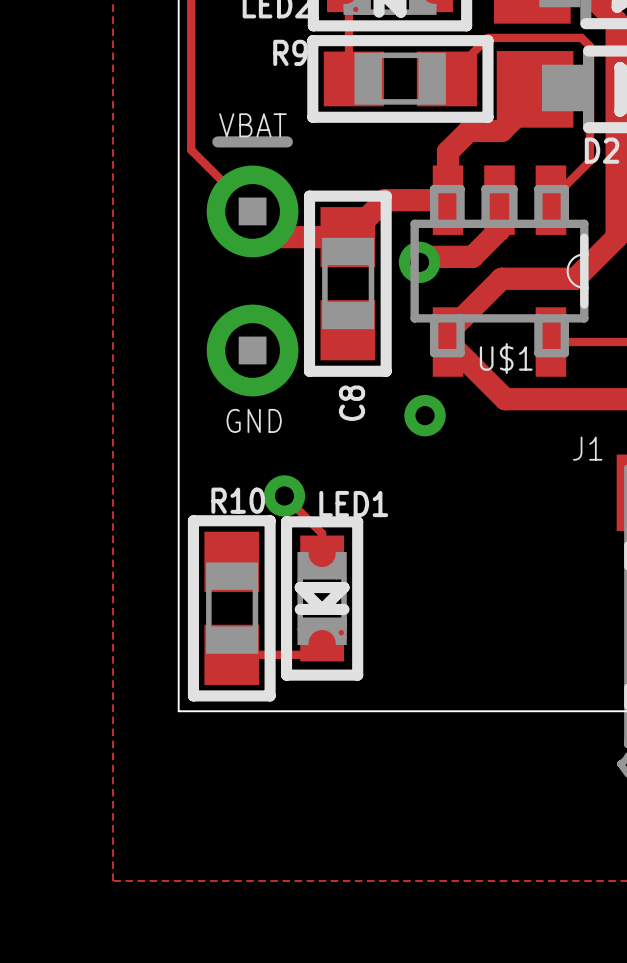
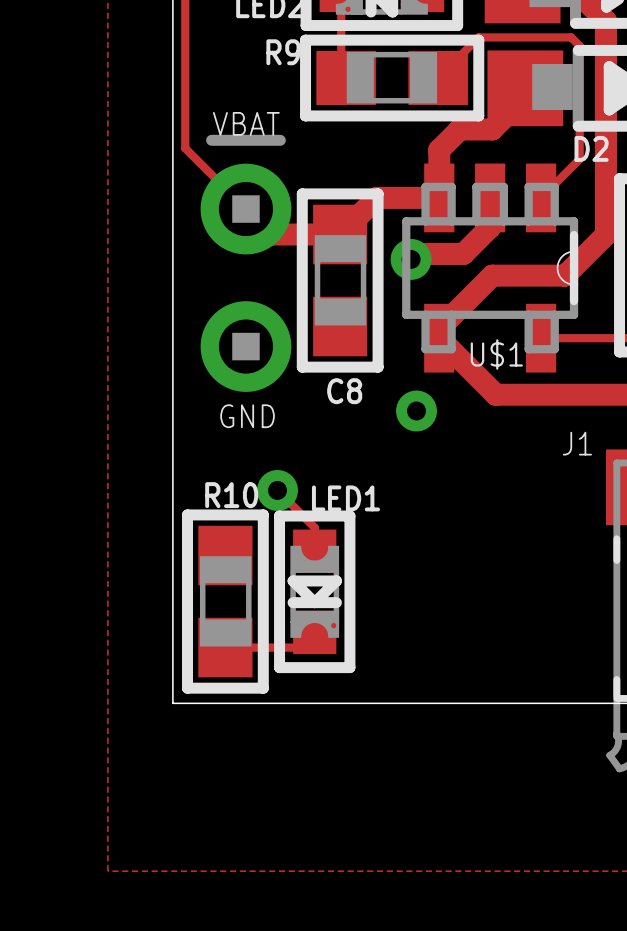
C8 name rotation: 0° (352, 403) -> 90° clockwise (344, 391)

